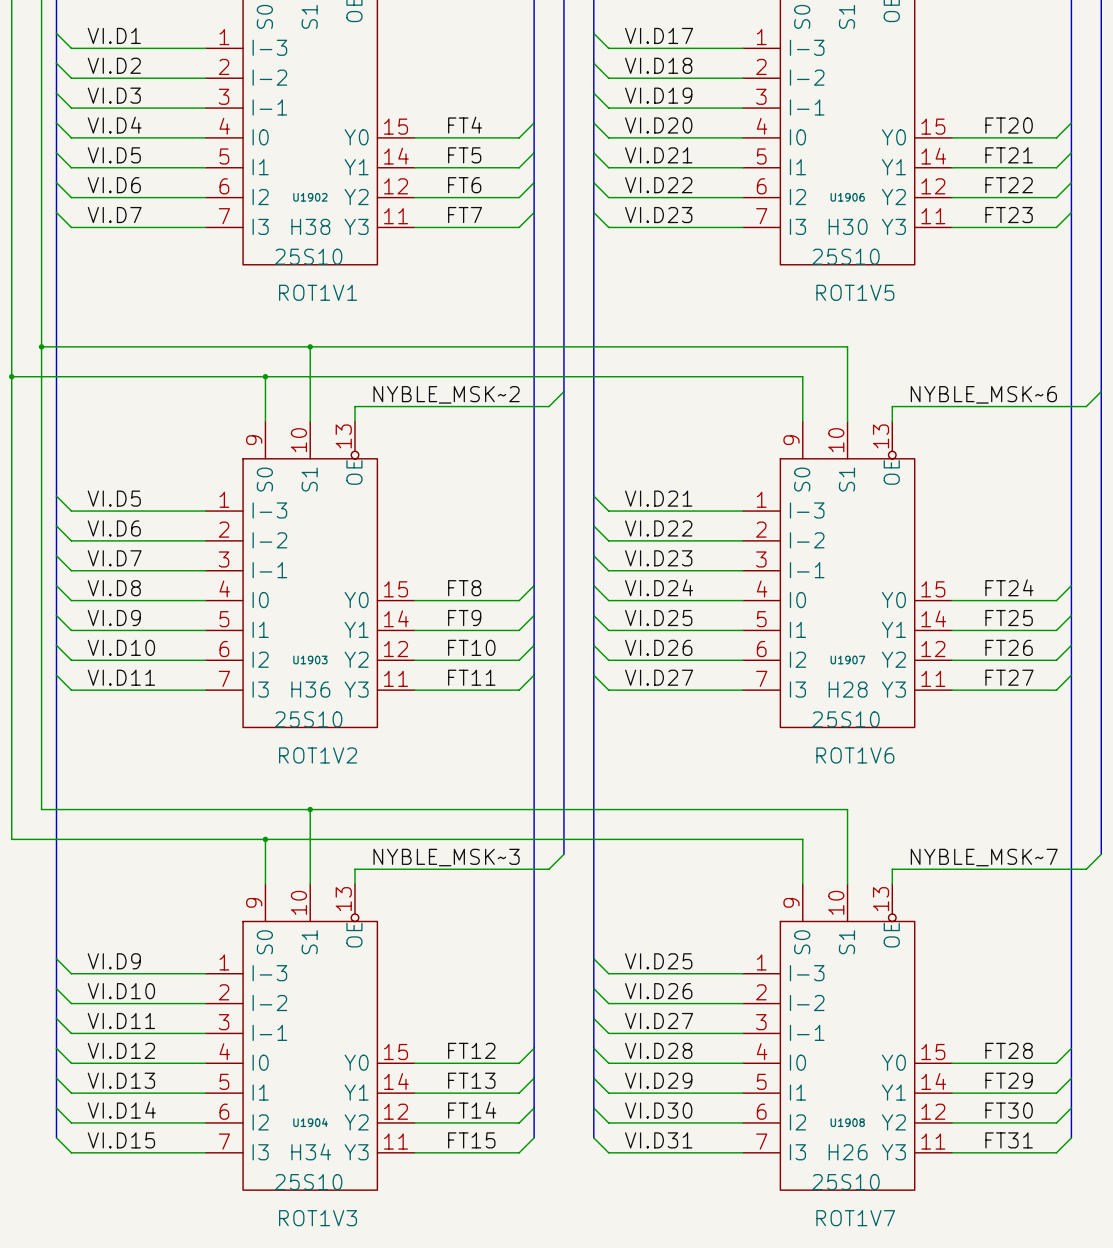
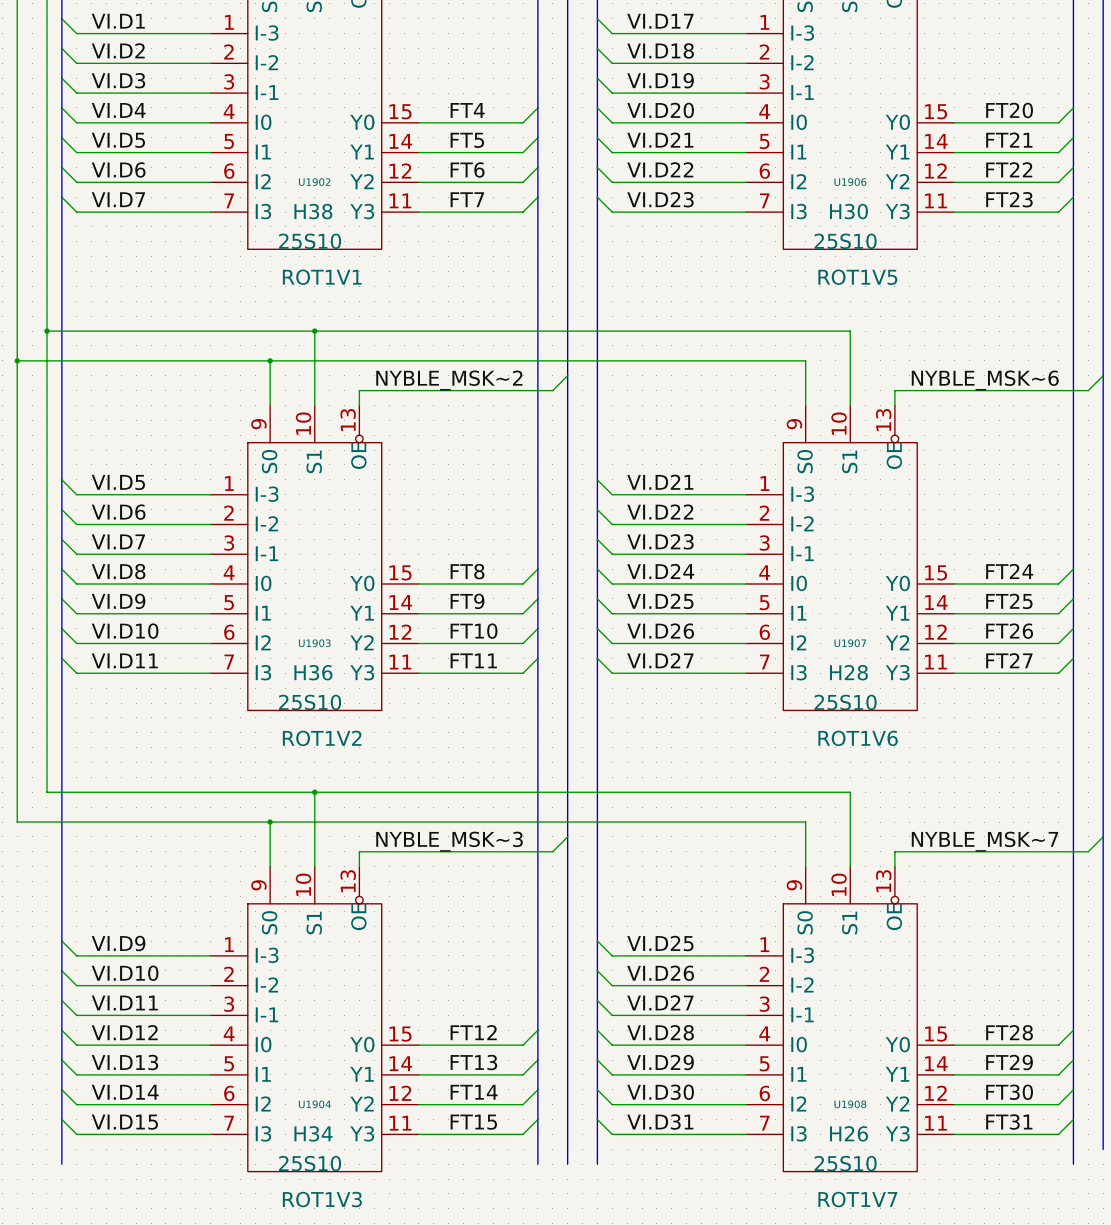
bus: none -> (567, 836) (567, 1164)
bus: none -> (1103, 836) (1103, 1149)
bus: none -> (61, 1119) (61, 1164)
bus: none -> (537, 1119) (537, 1164)
bus: none -> (597, 1119) (597, 1164)
bus: none -> (1073, 1119) (1073, 1164)

